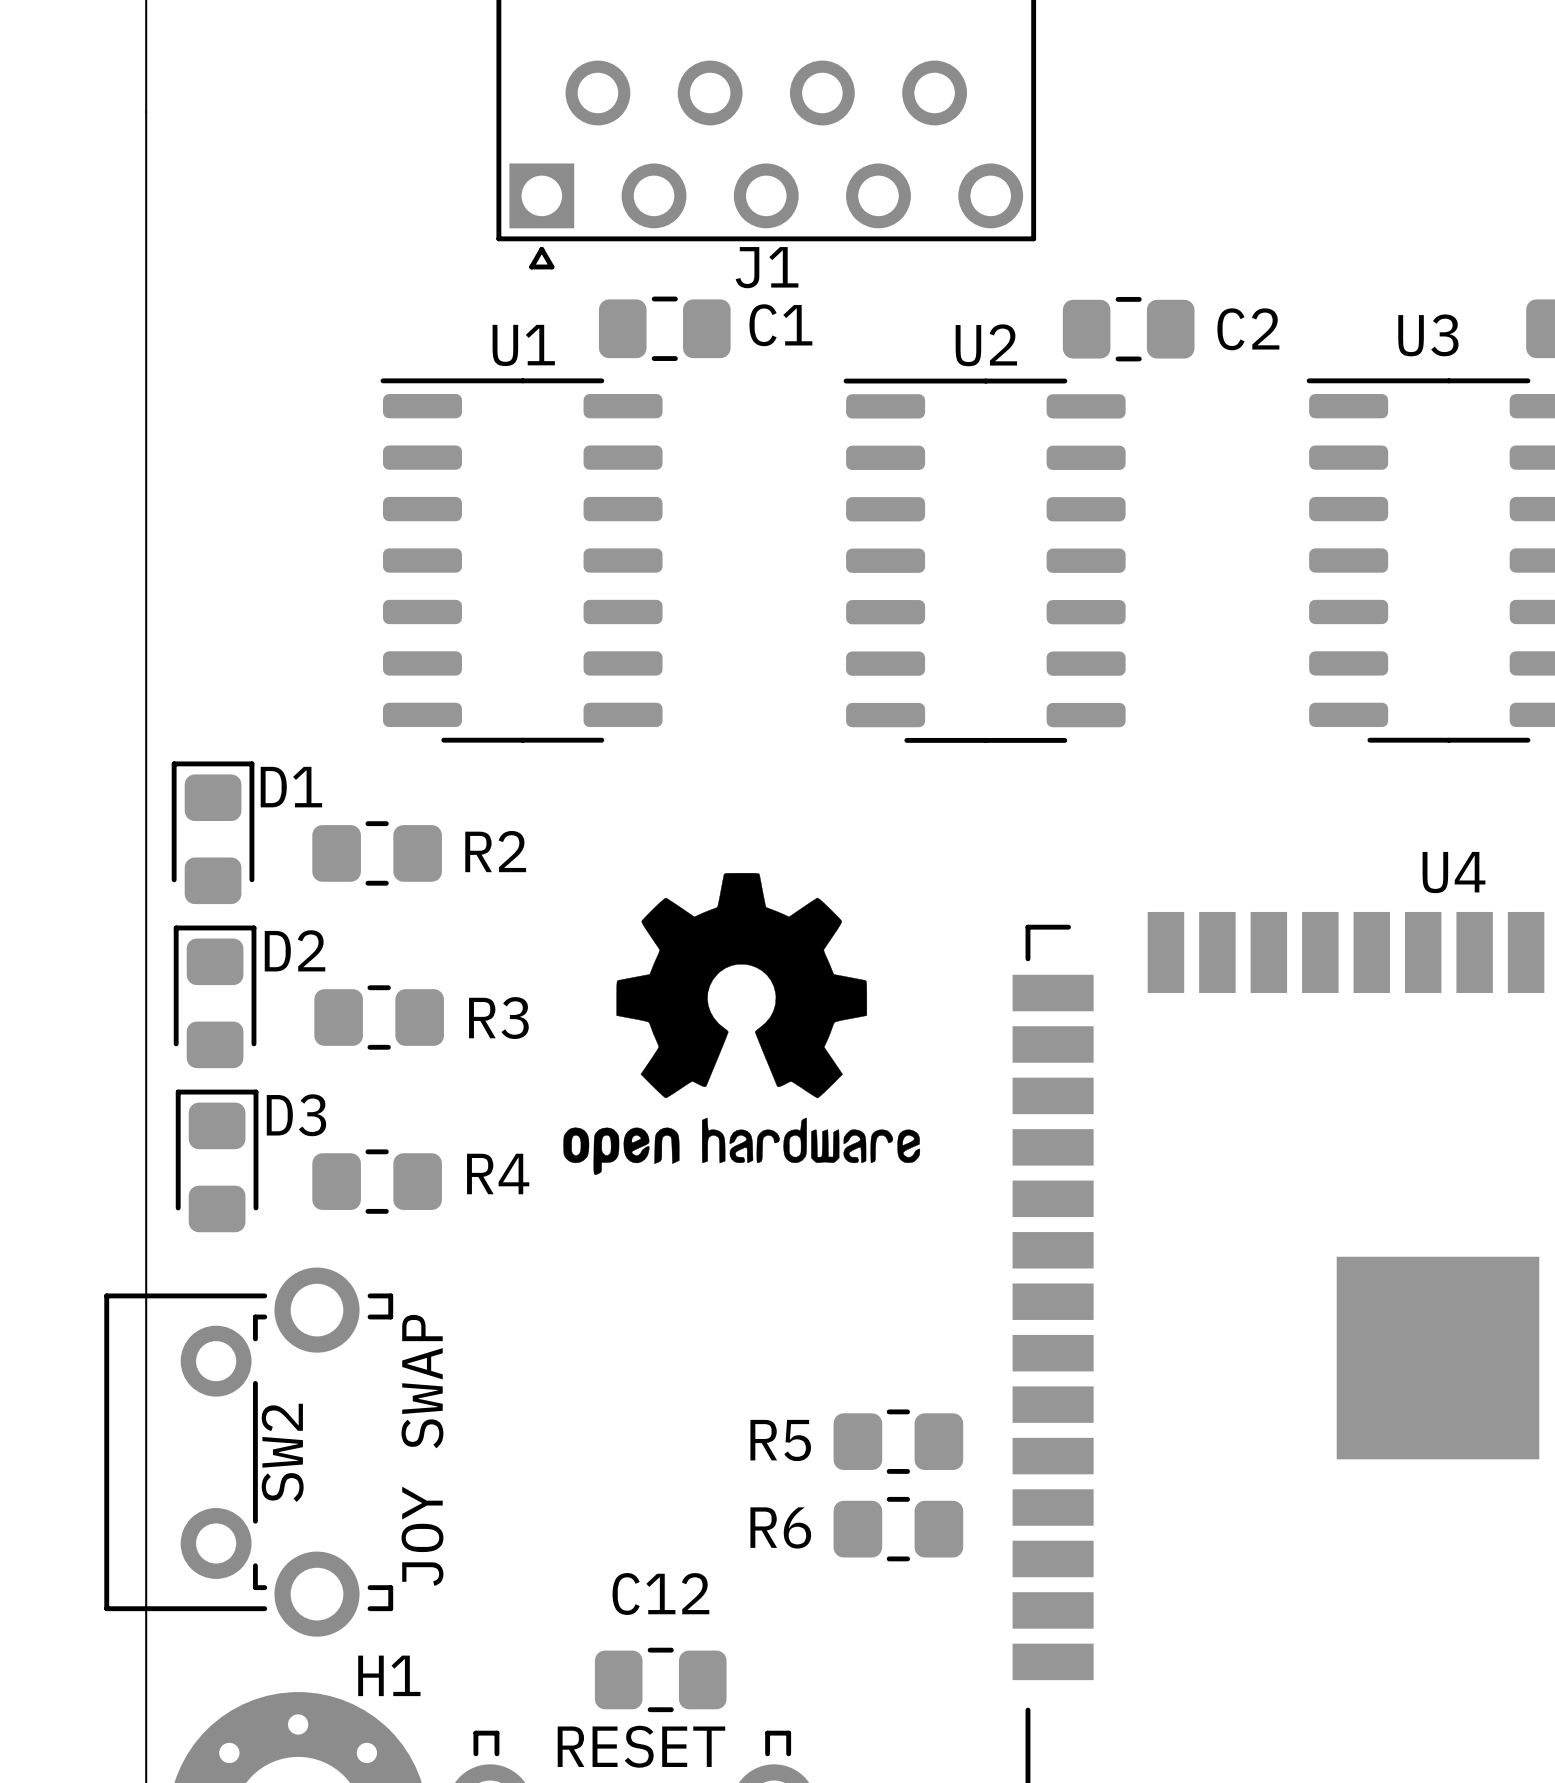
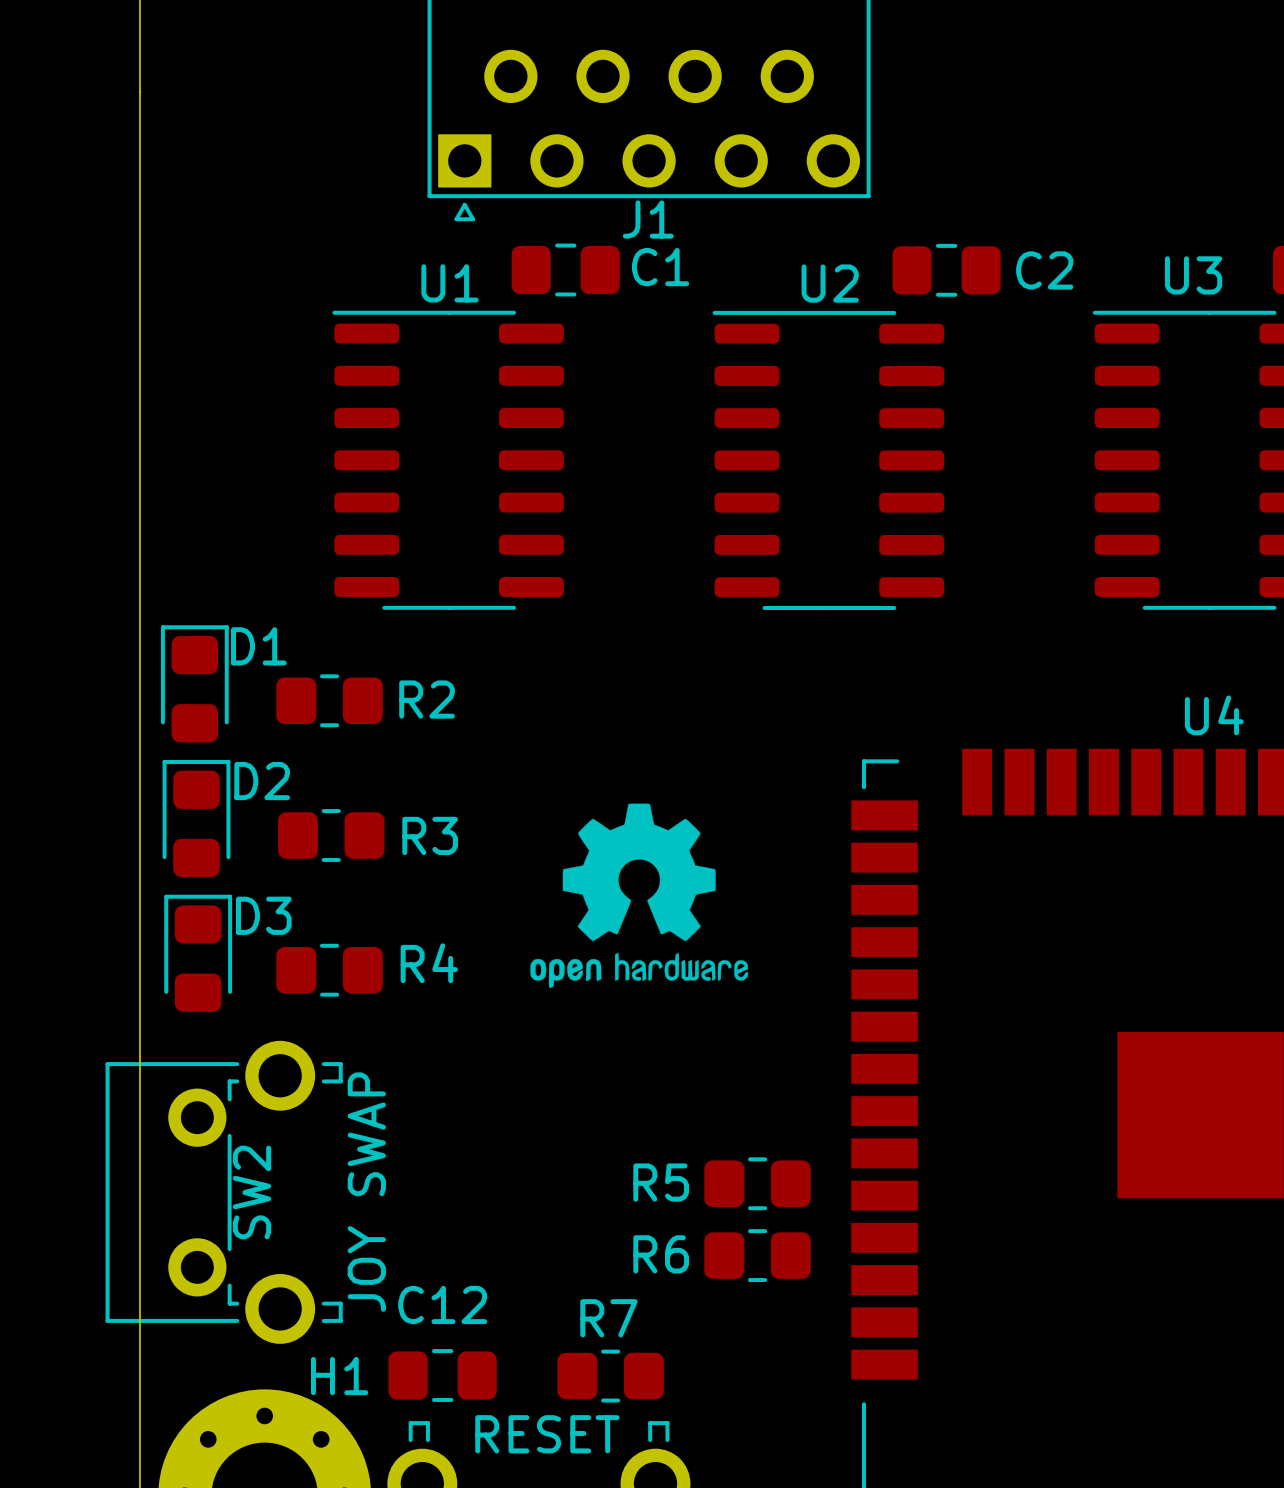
drawing: [563, 872, 921, 1175] -> none
drawing: none -> [530, 803, 749, 988]
R7: none -> (610, 1376)
C12 position: (660, 1679) -> (442, 1375)

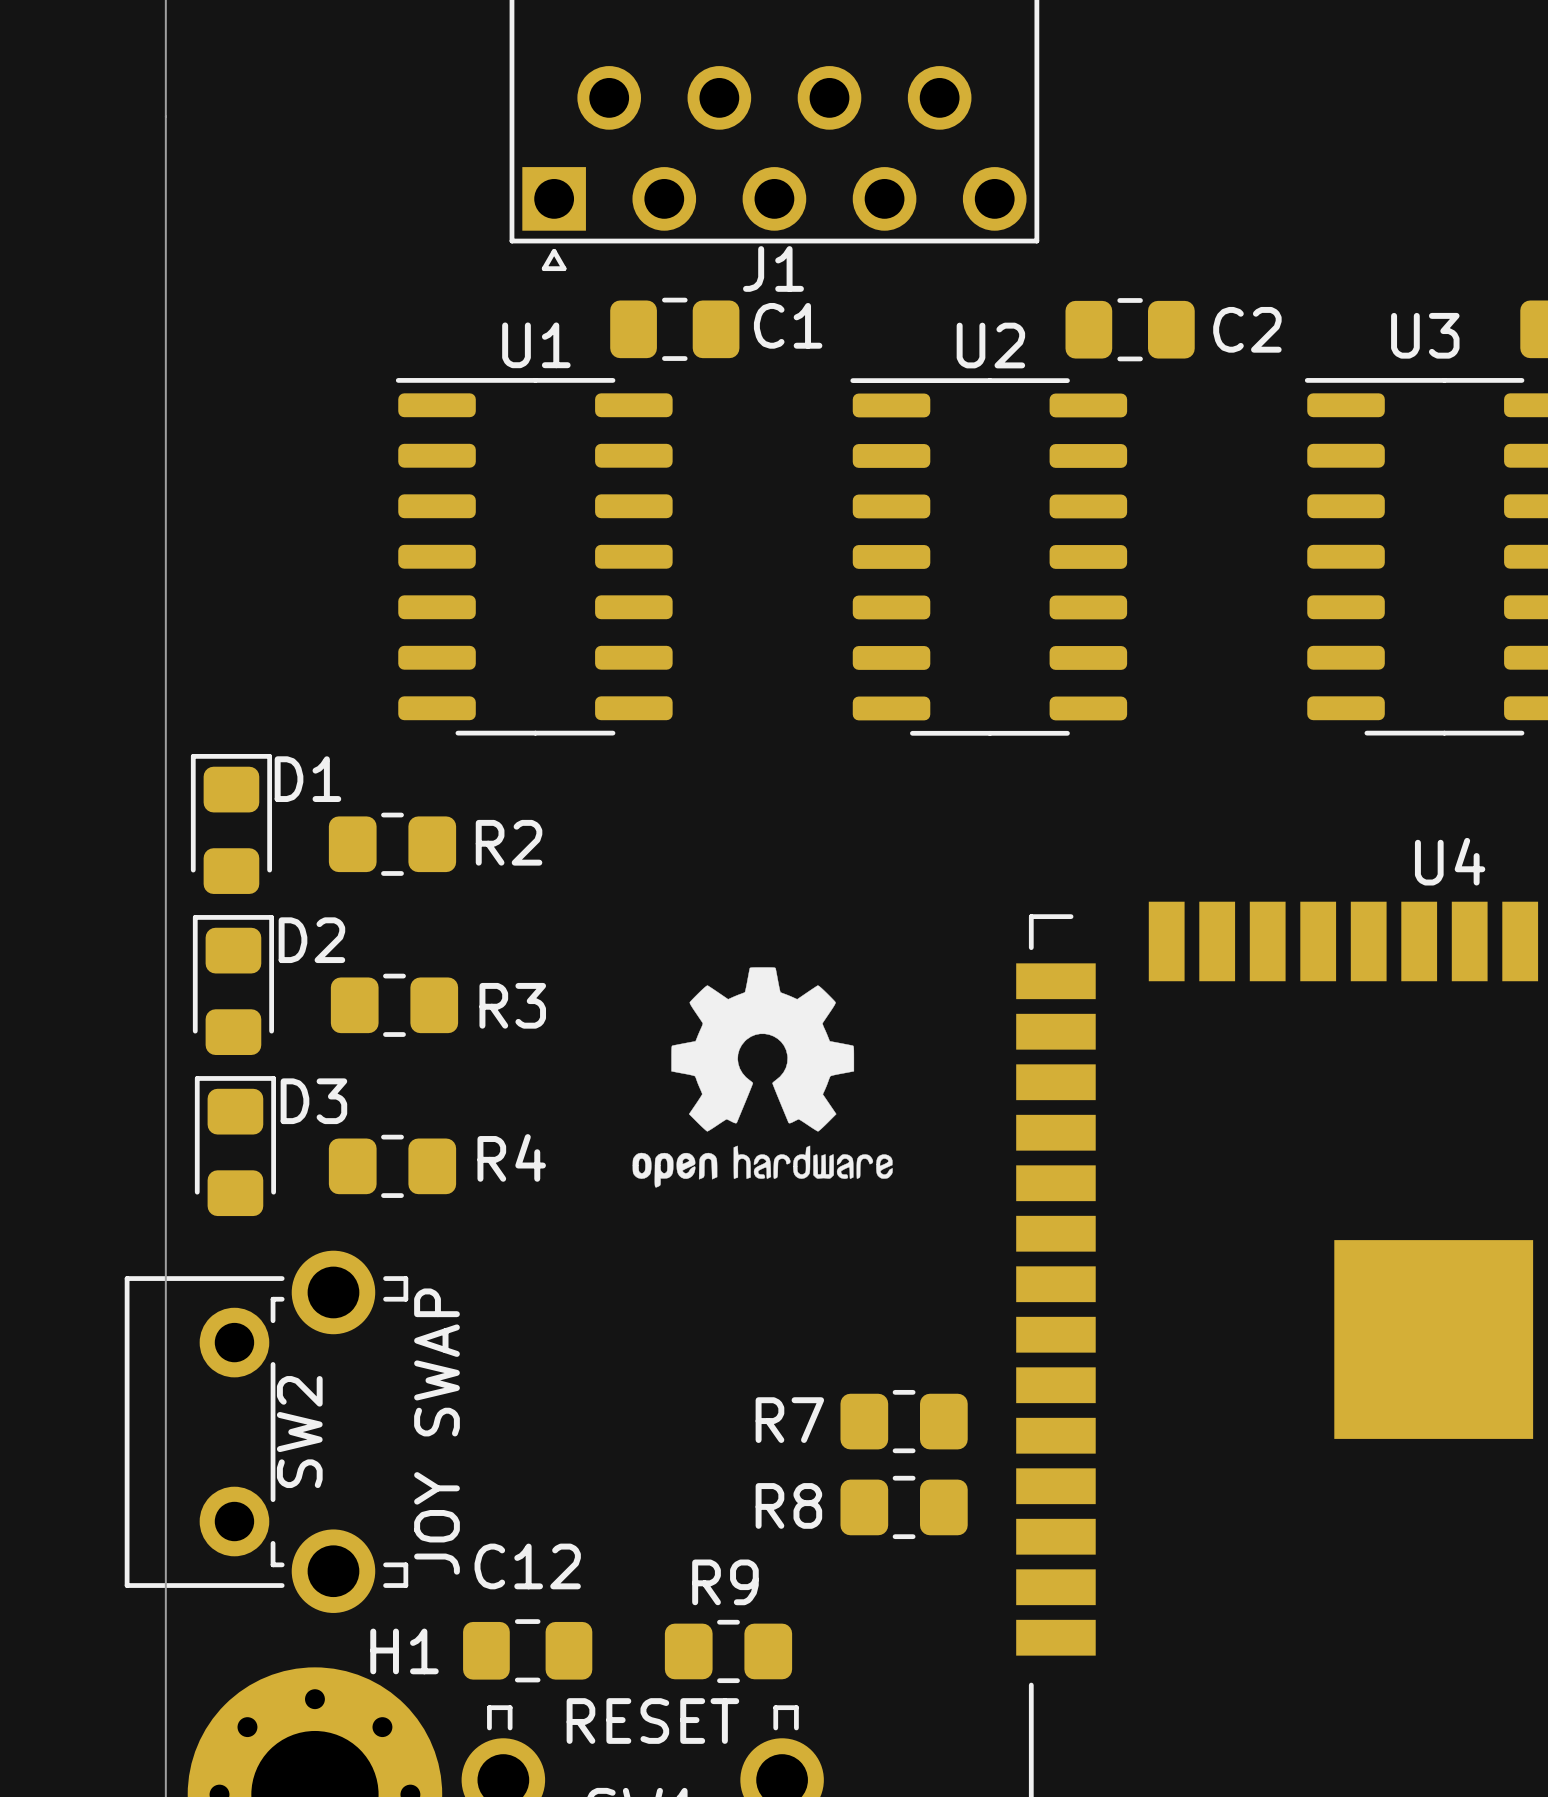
R5 name: R5 (661, 1182) -> R7 (789, 1420)
R6 name: R6 (661, 1254) -> R8 (788, 1505)
R7 name: R7 (608, 1318) -> R9 (725, 1582)

